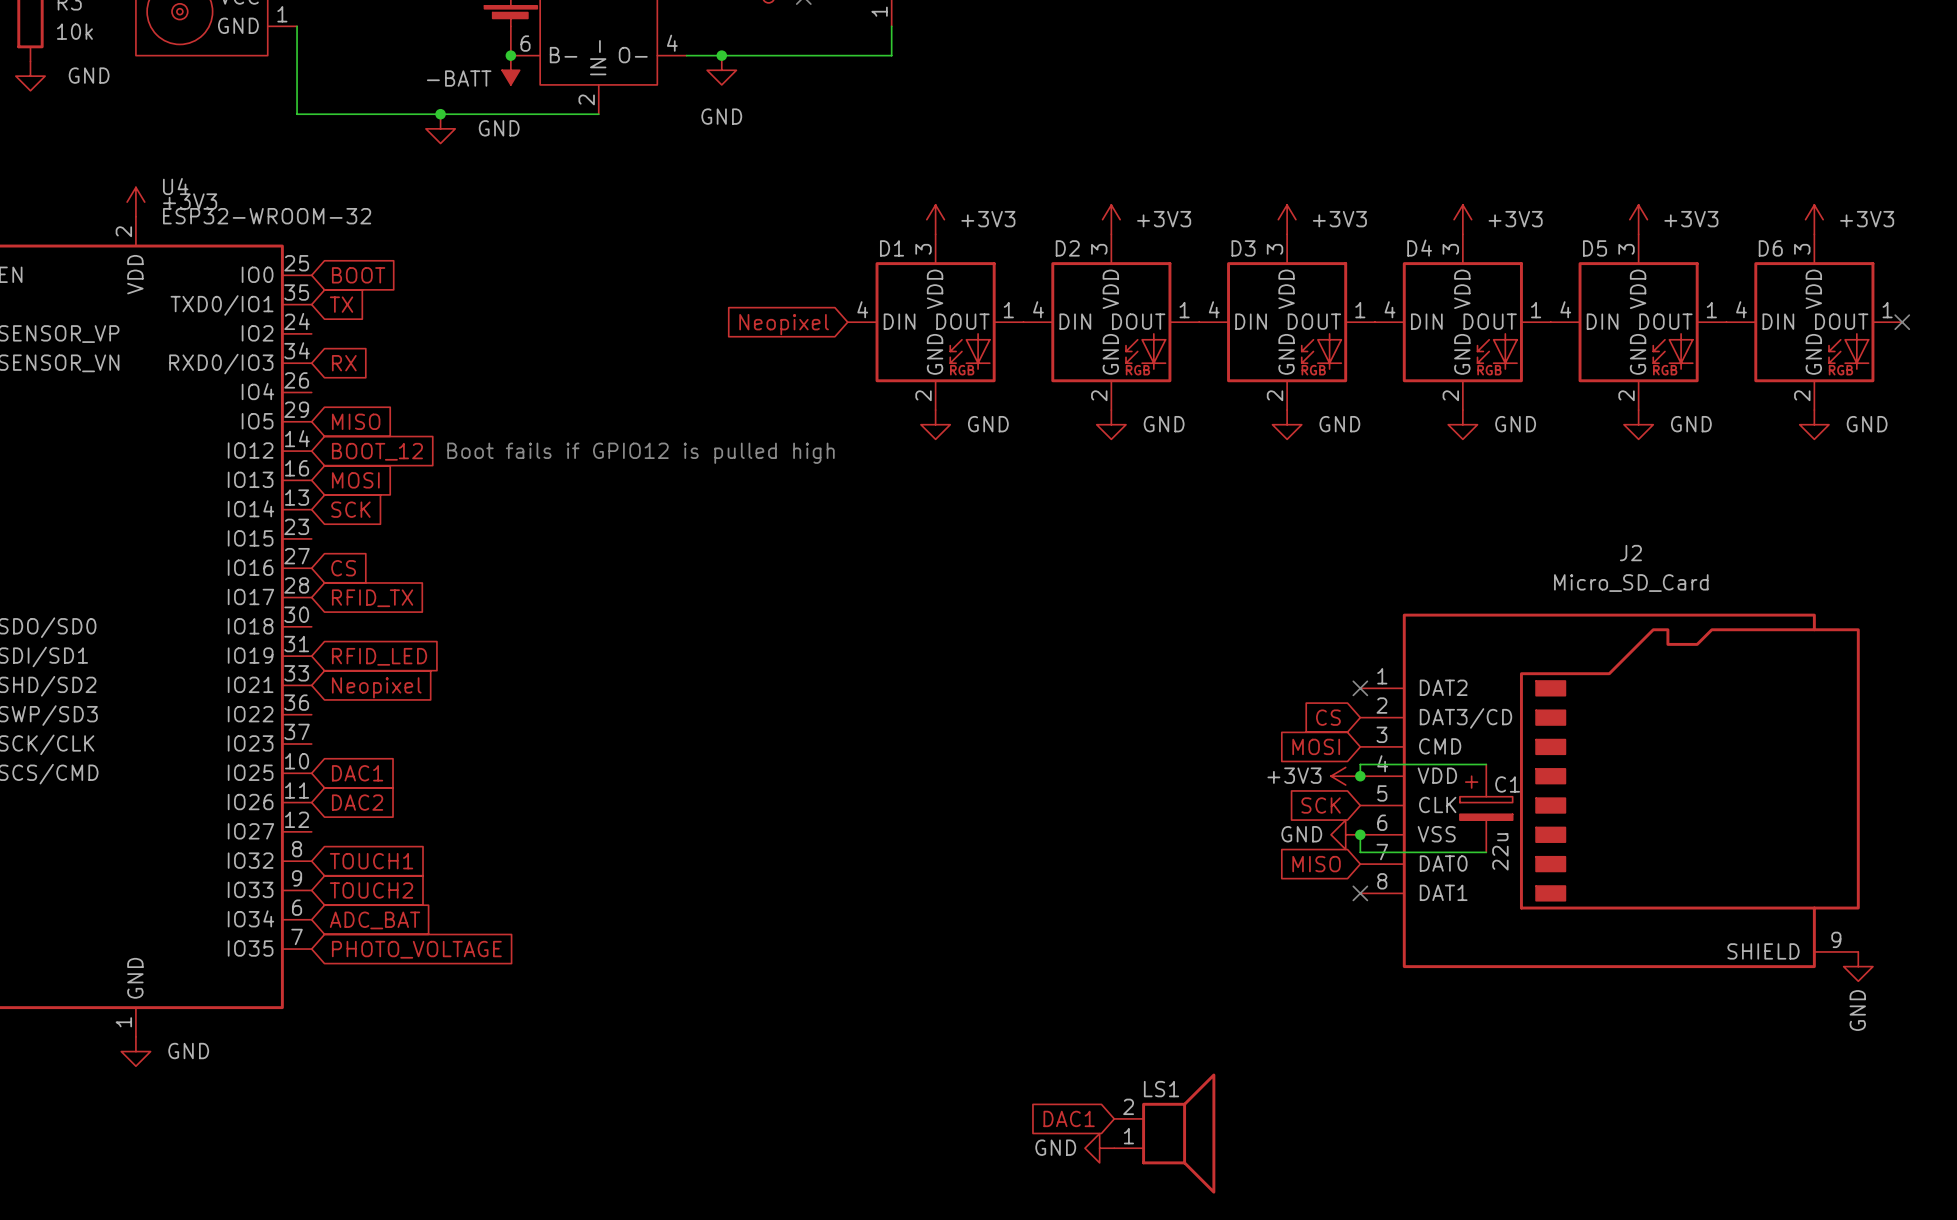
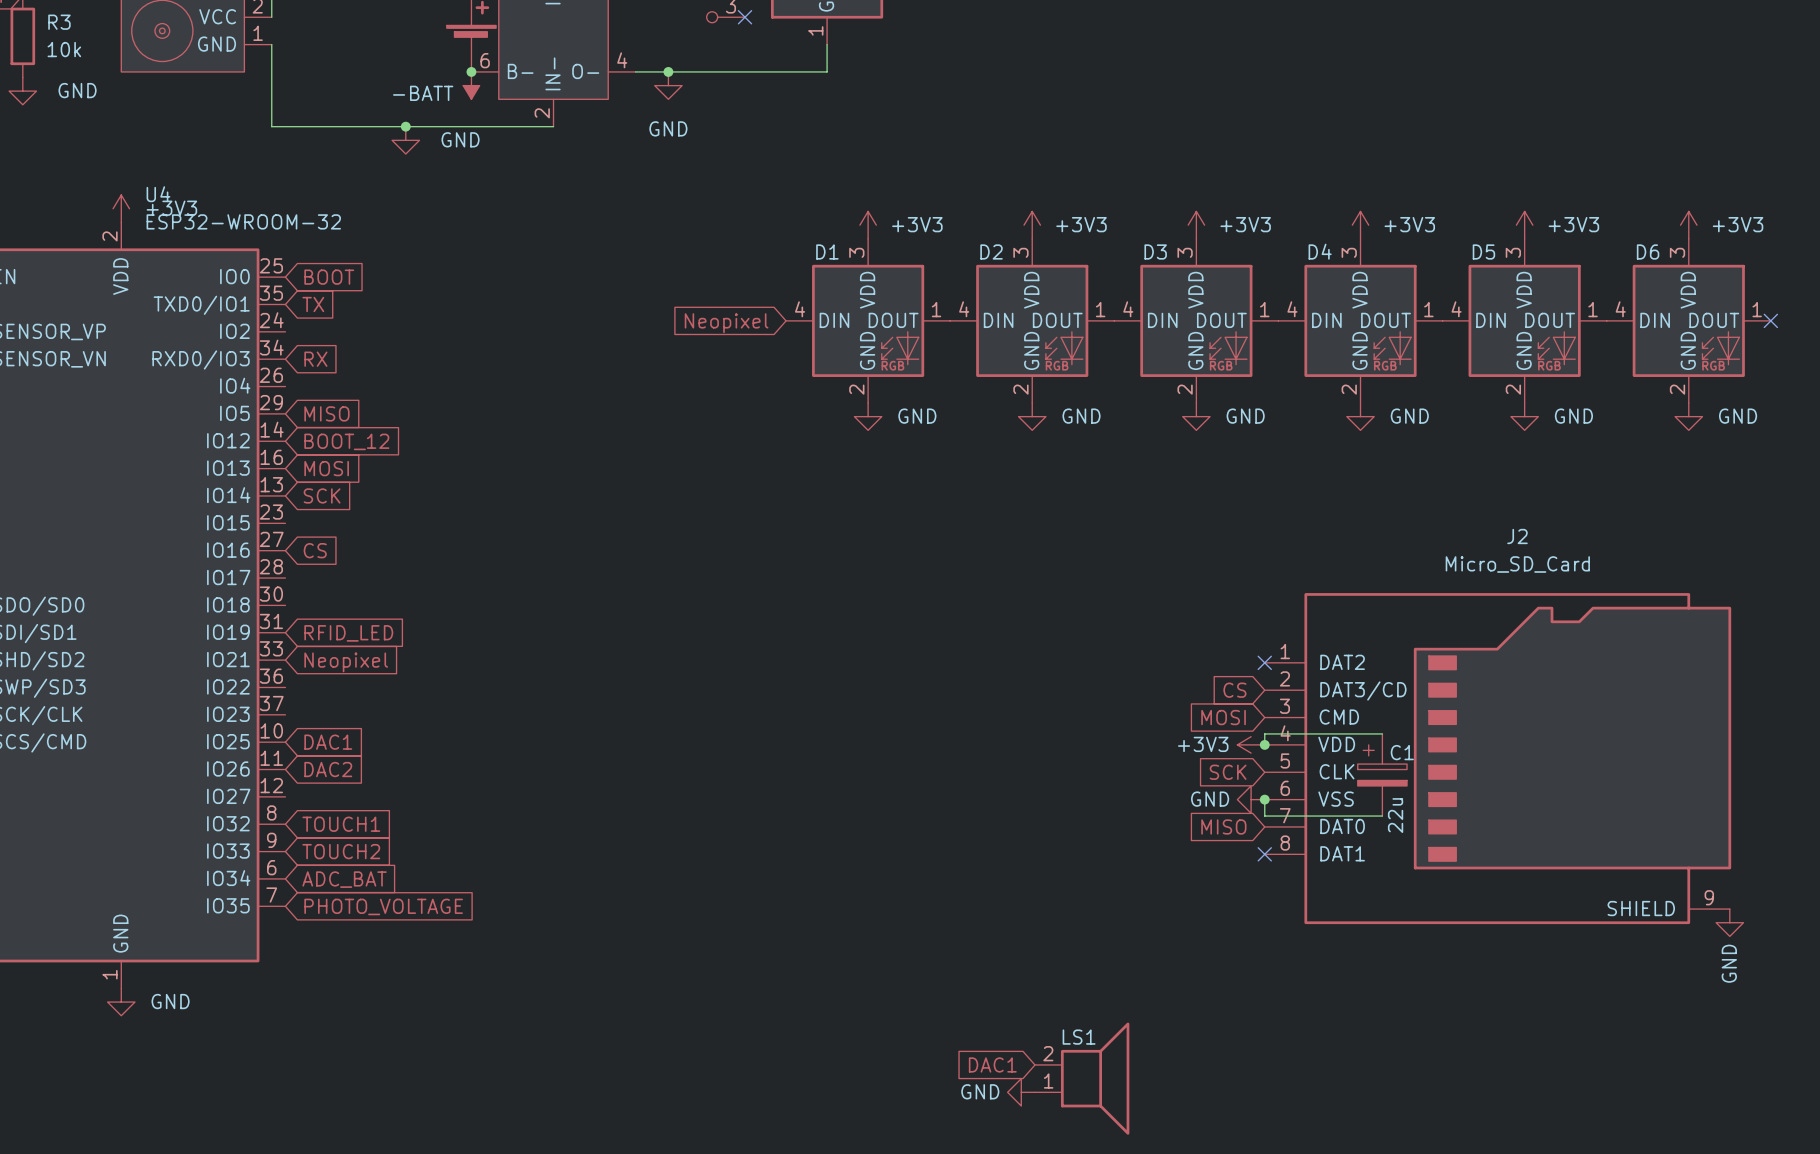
text: Boot fails if GPIO12 is pulled high (640, 453) -> none
global label: RFID_TX (372, 598) -> none

